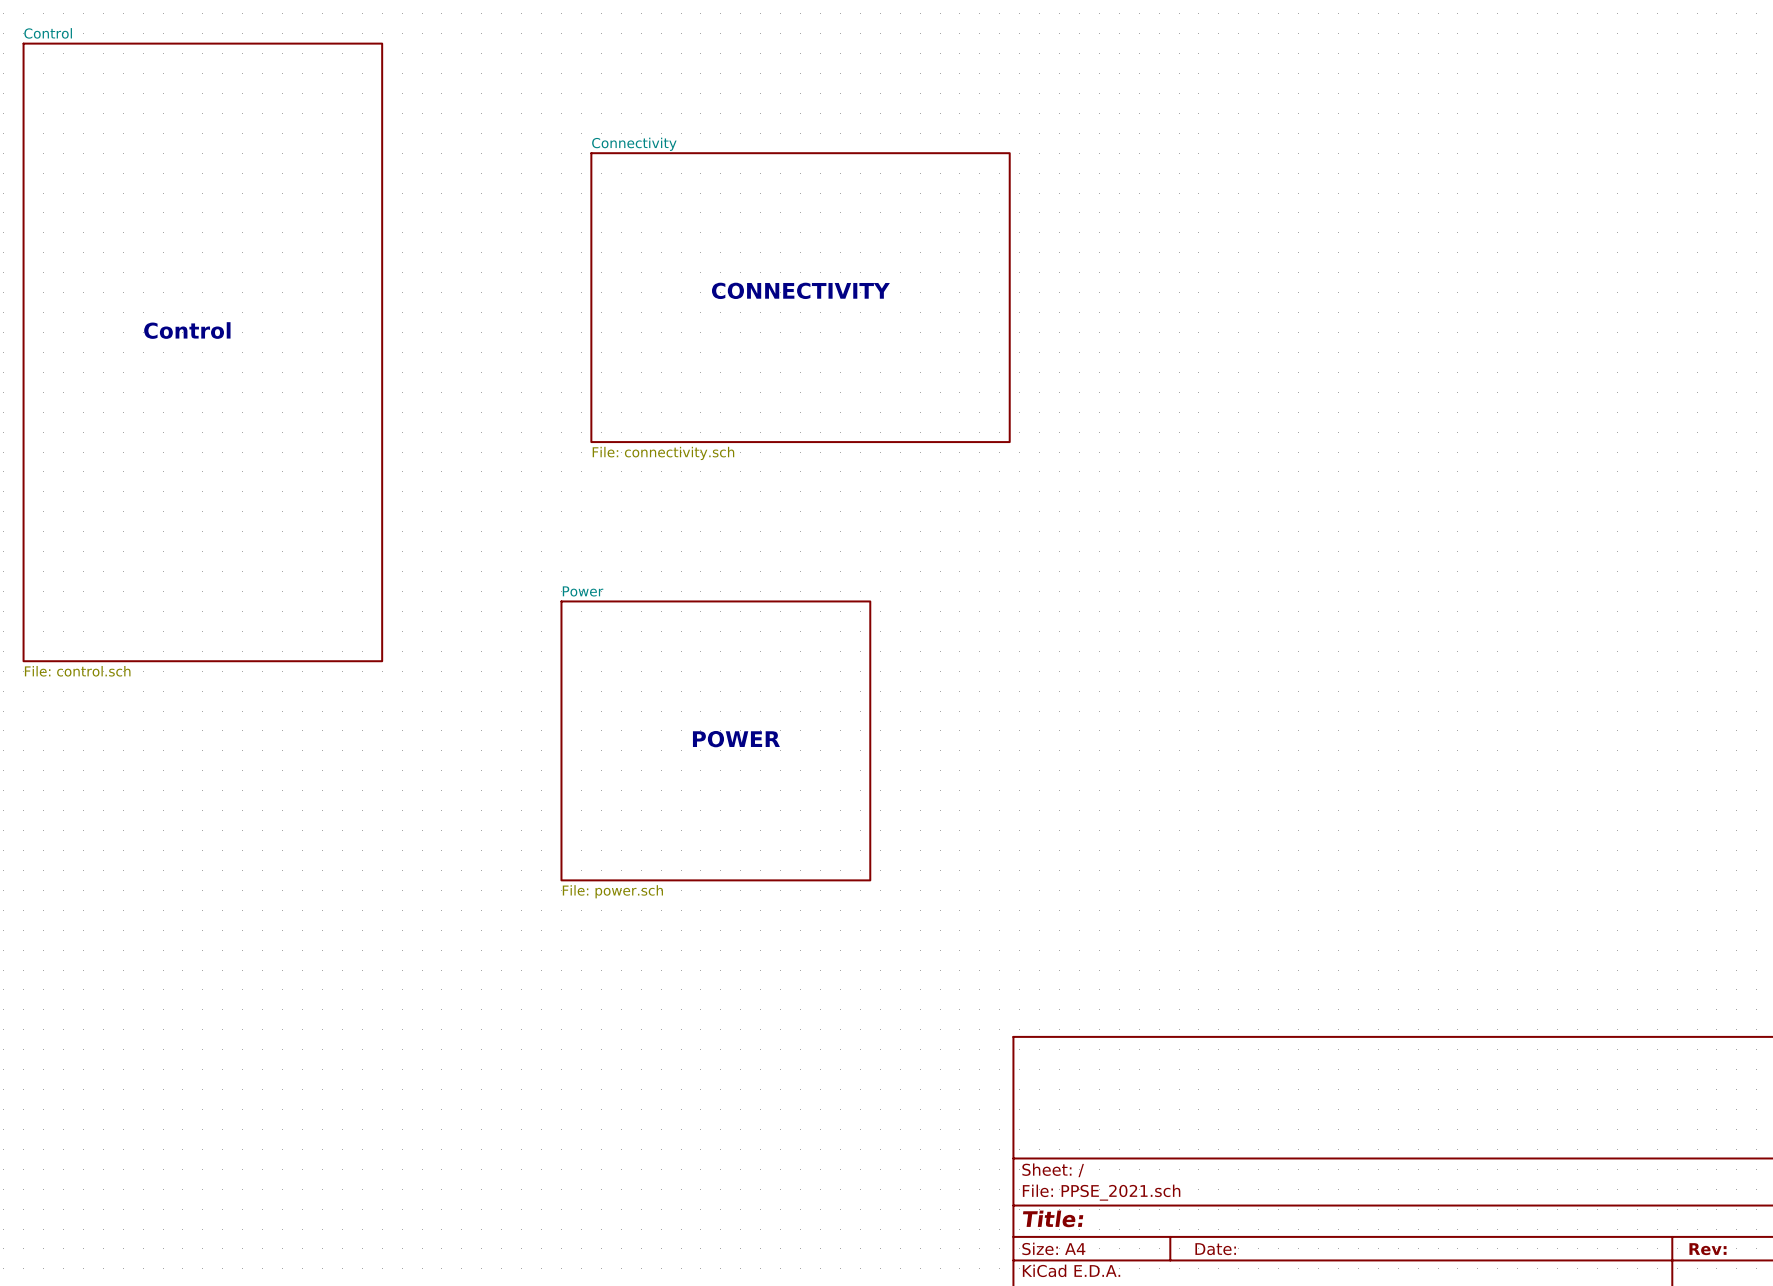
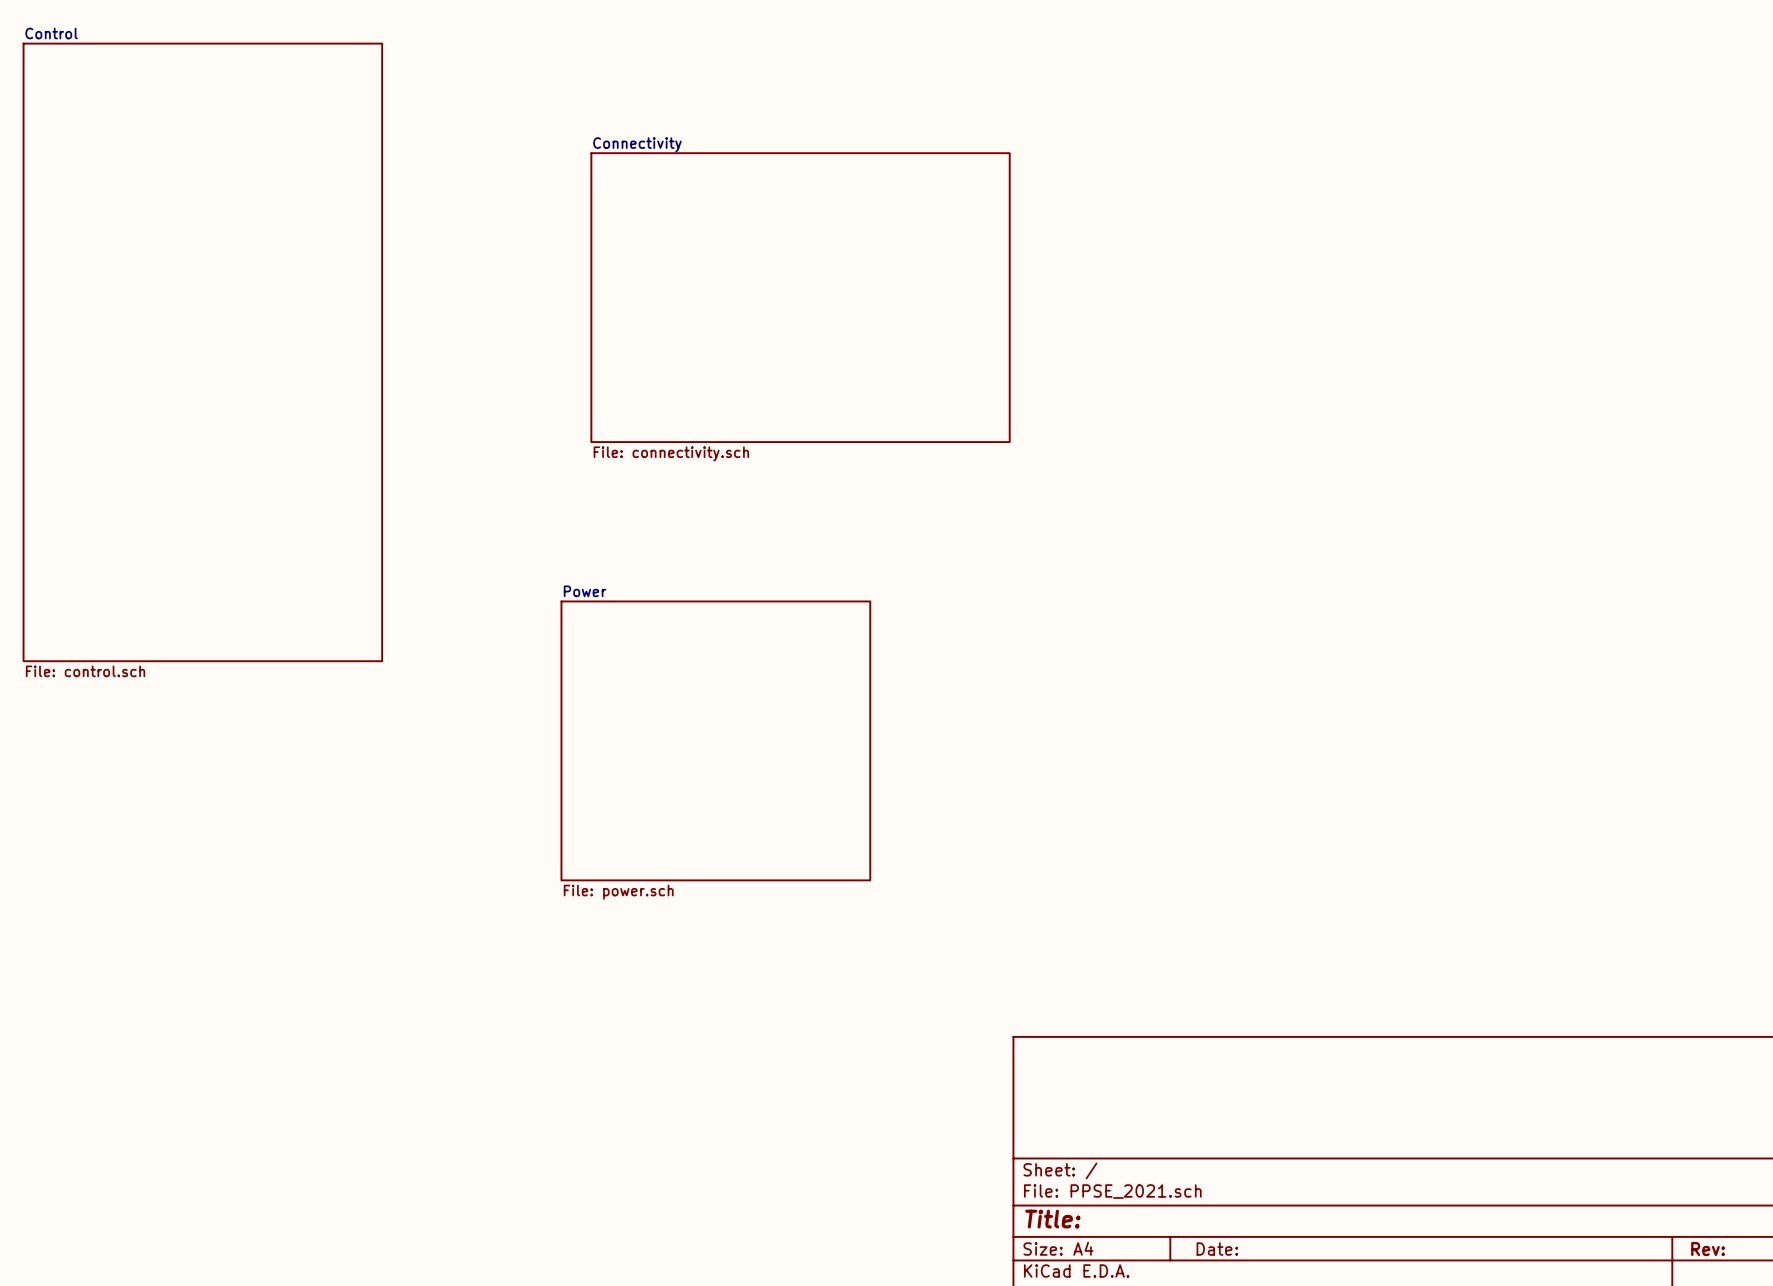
text: CONNECTIVITY (800, 290) -> none
text: Control (187, 330) -> none
text: POWER (736, 739) -> none

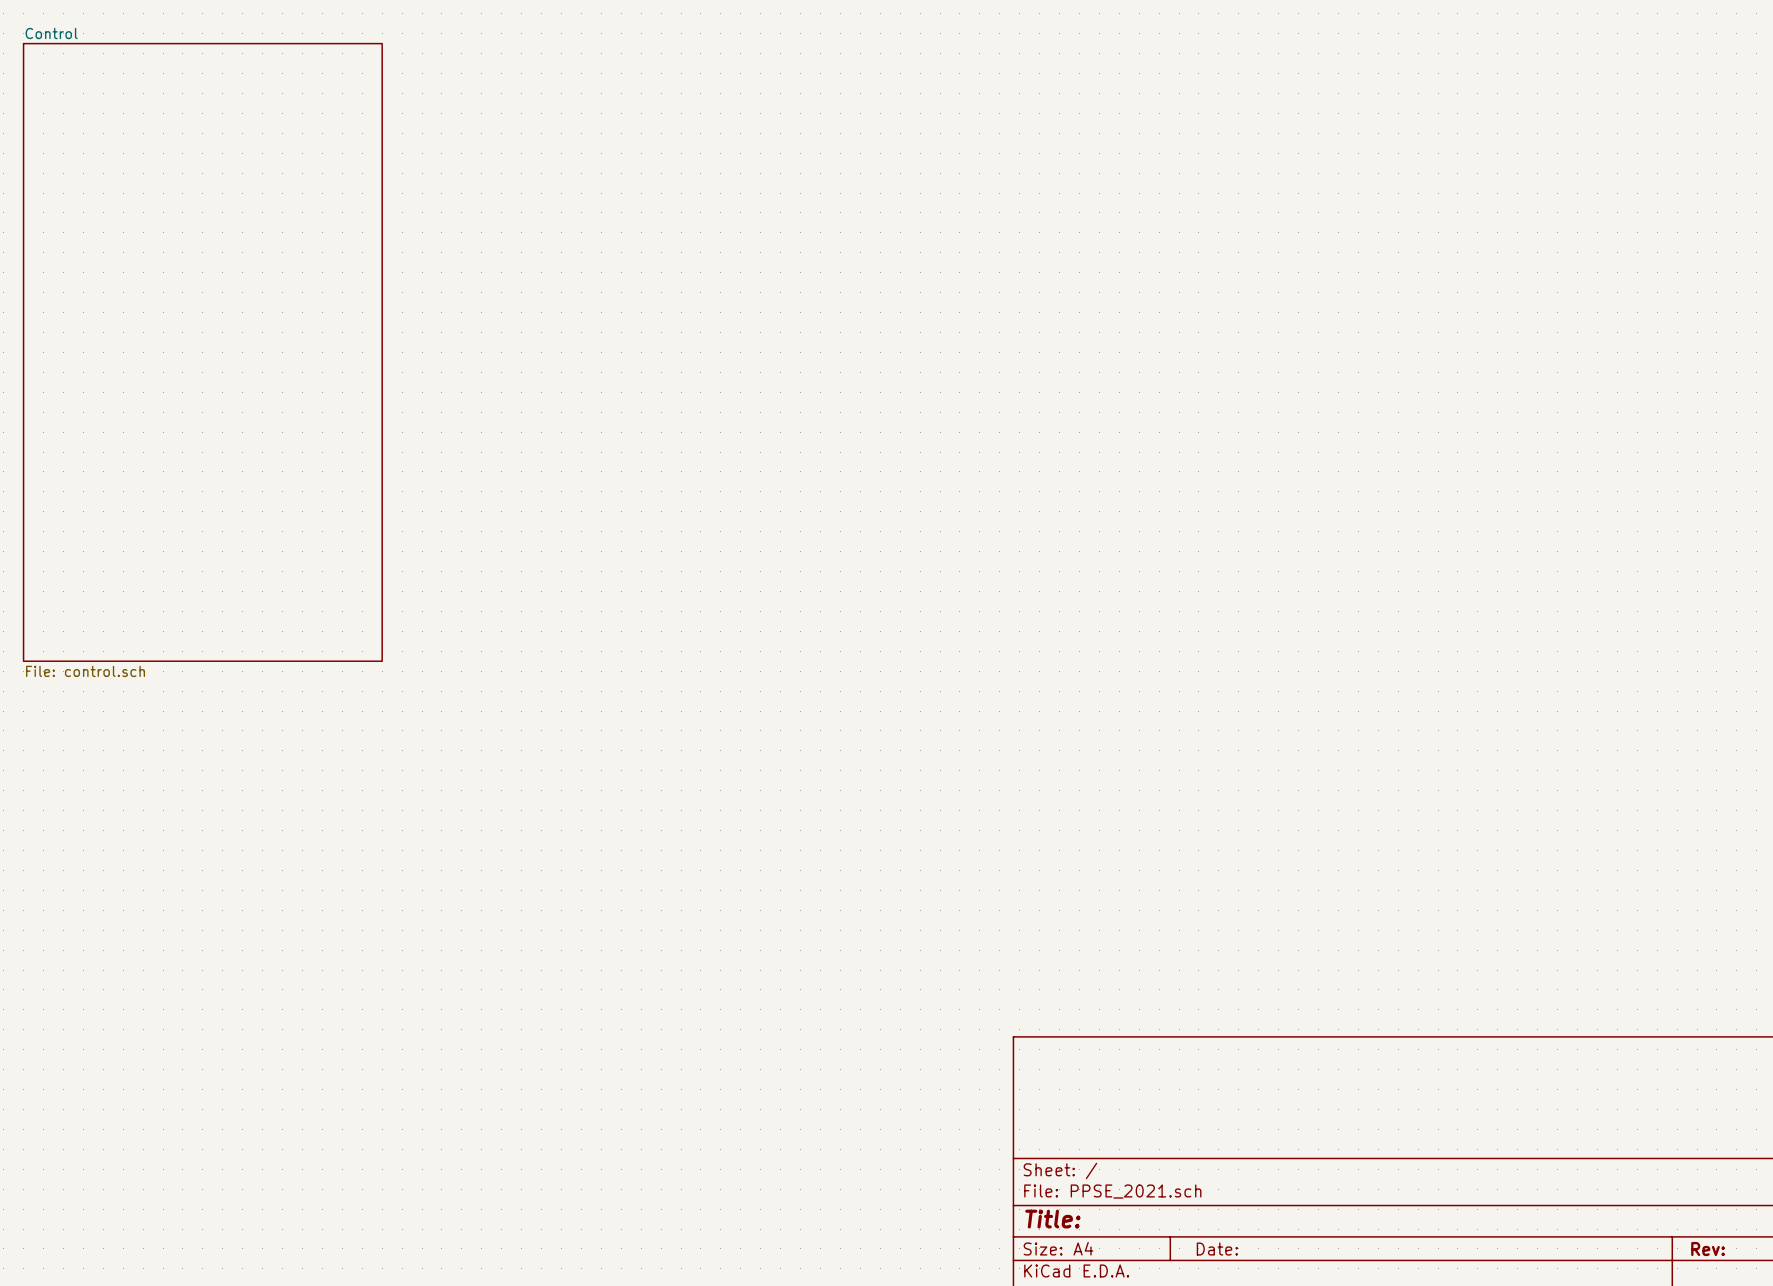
sheet Connectivity: File: connectivity.sch (800, 297) -> none
sheet Power: File: power.sch (715, 740) -> none

